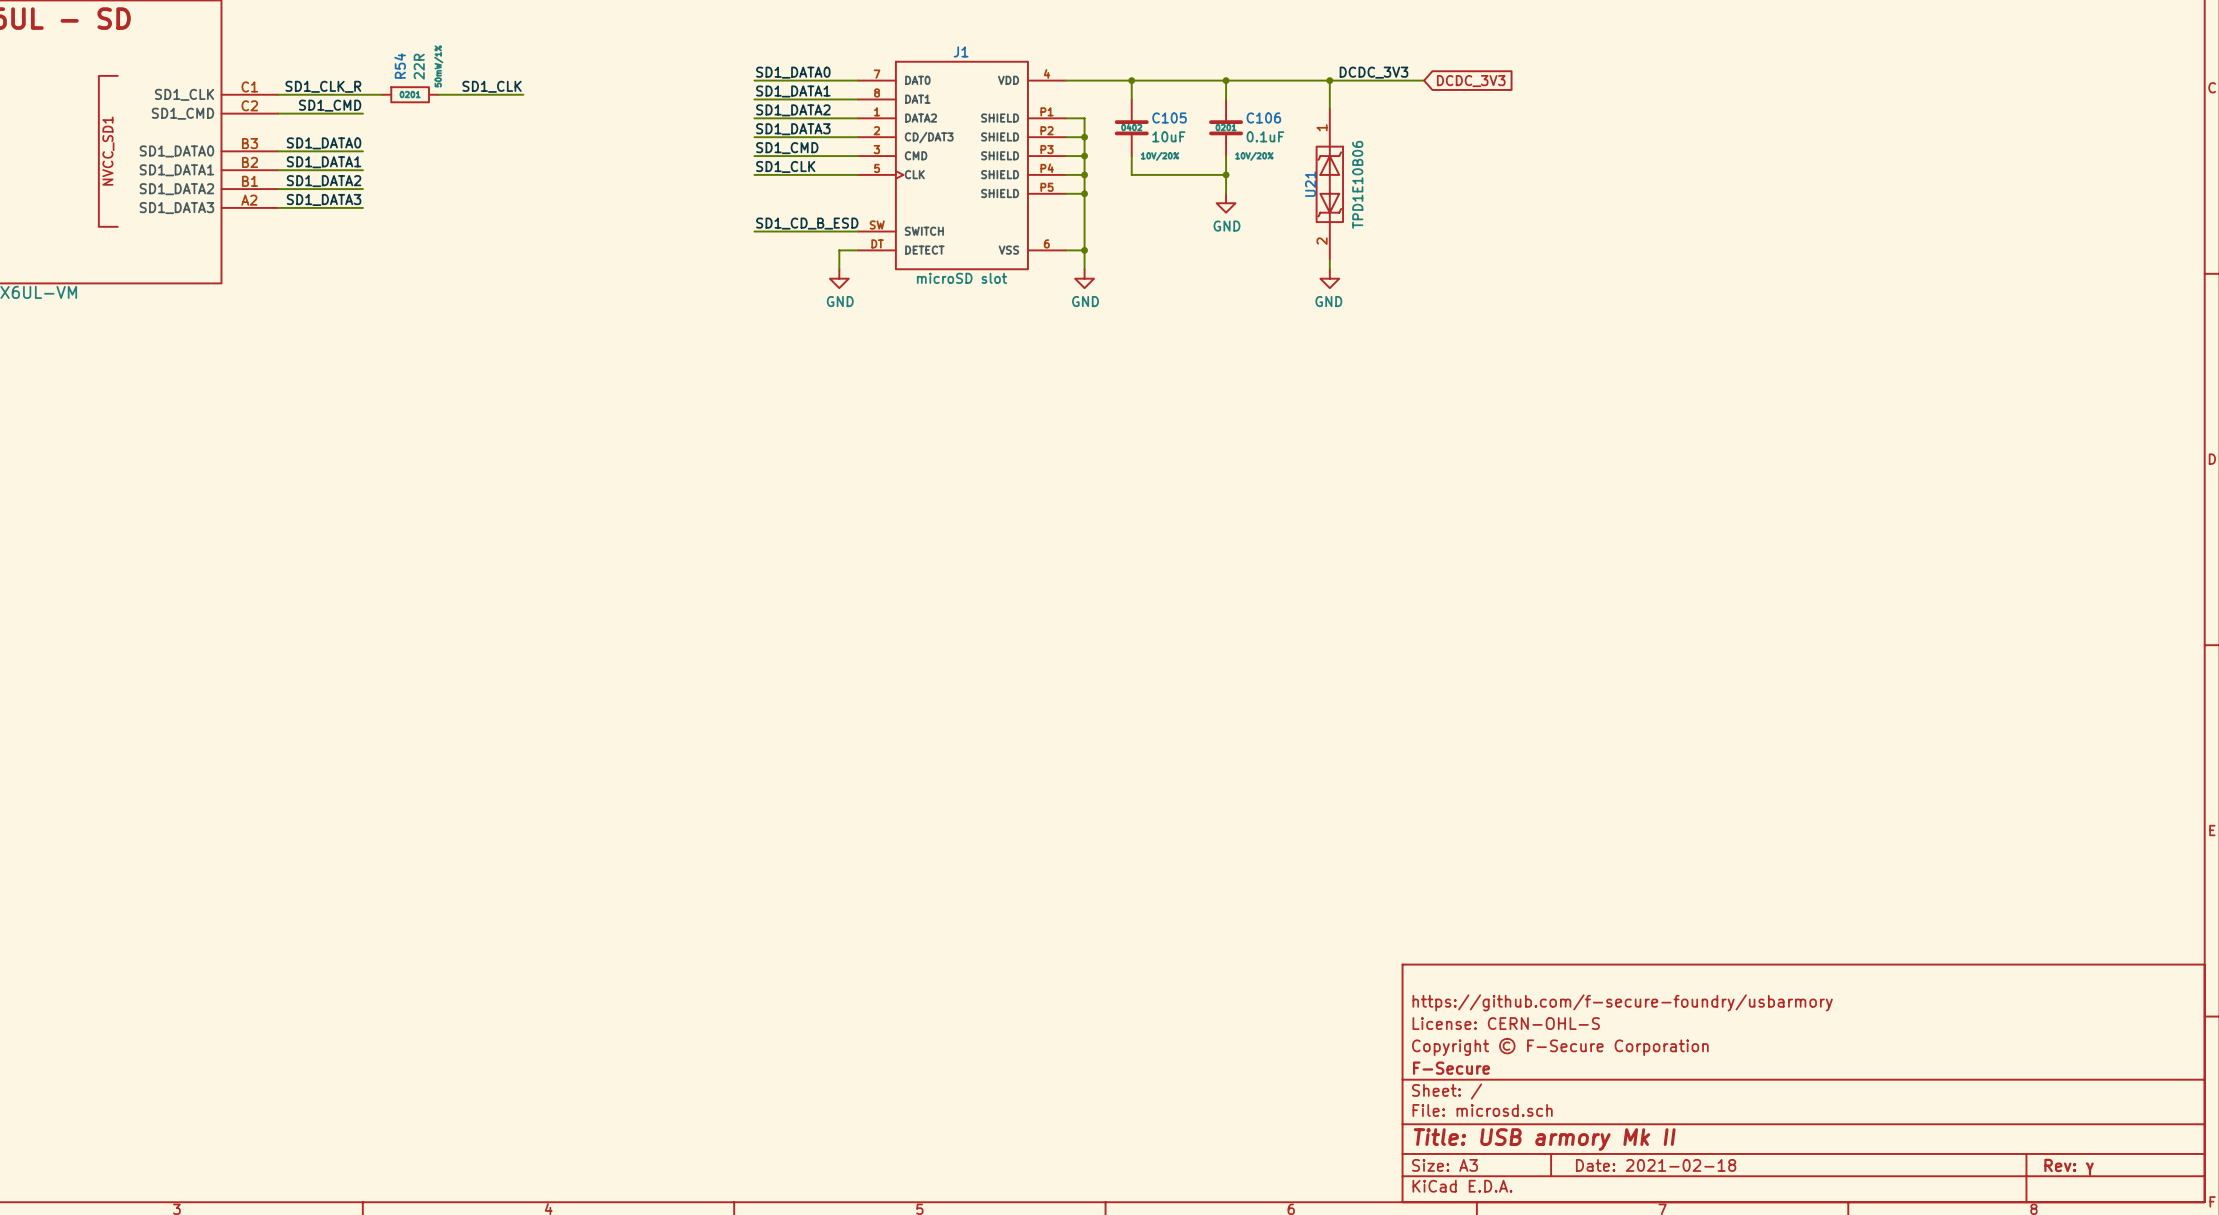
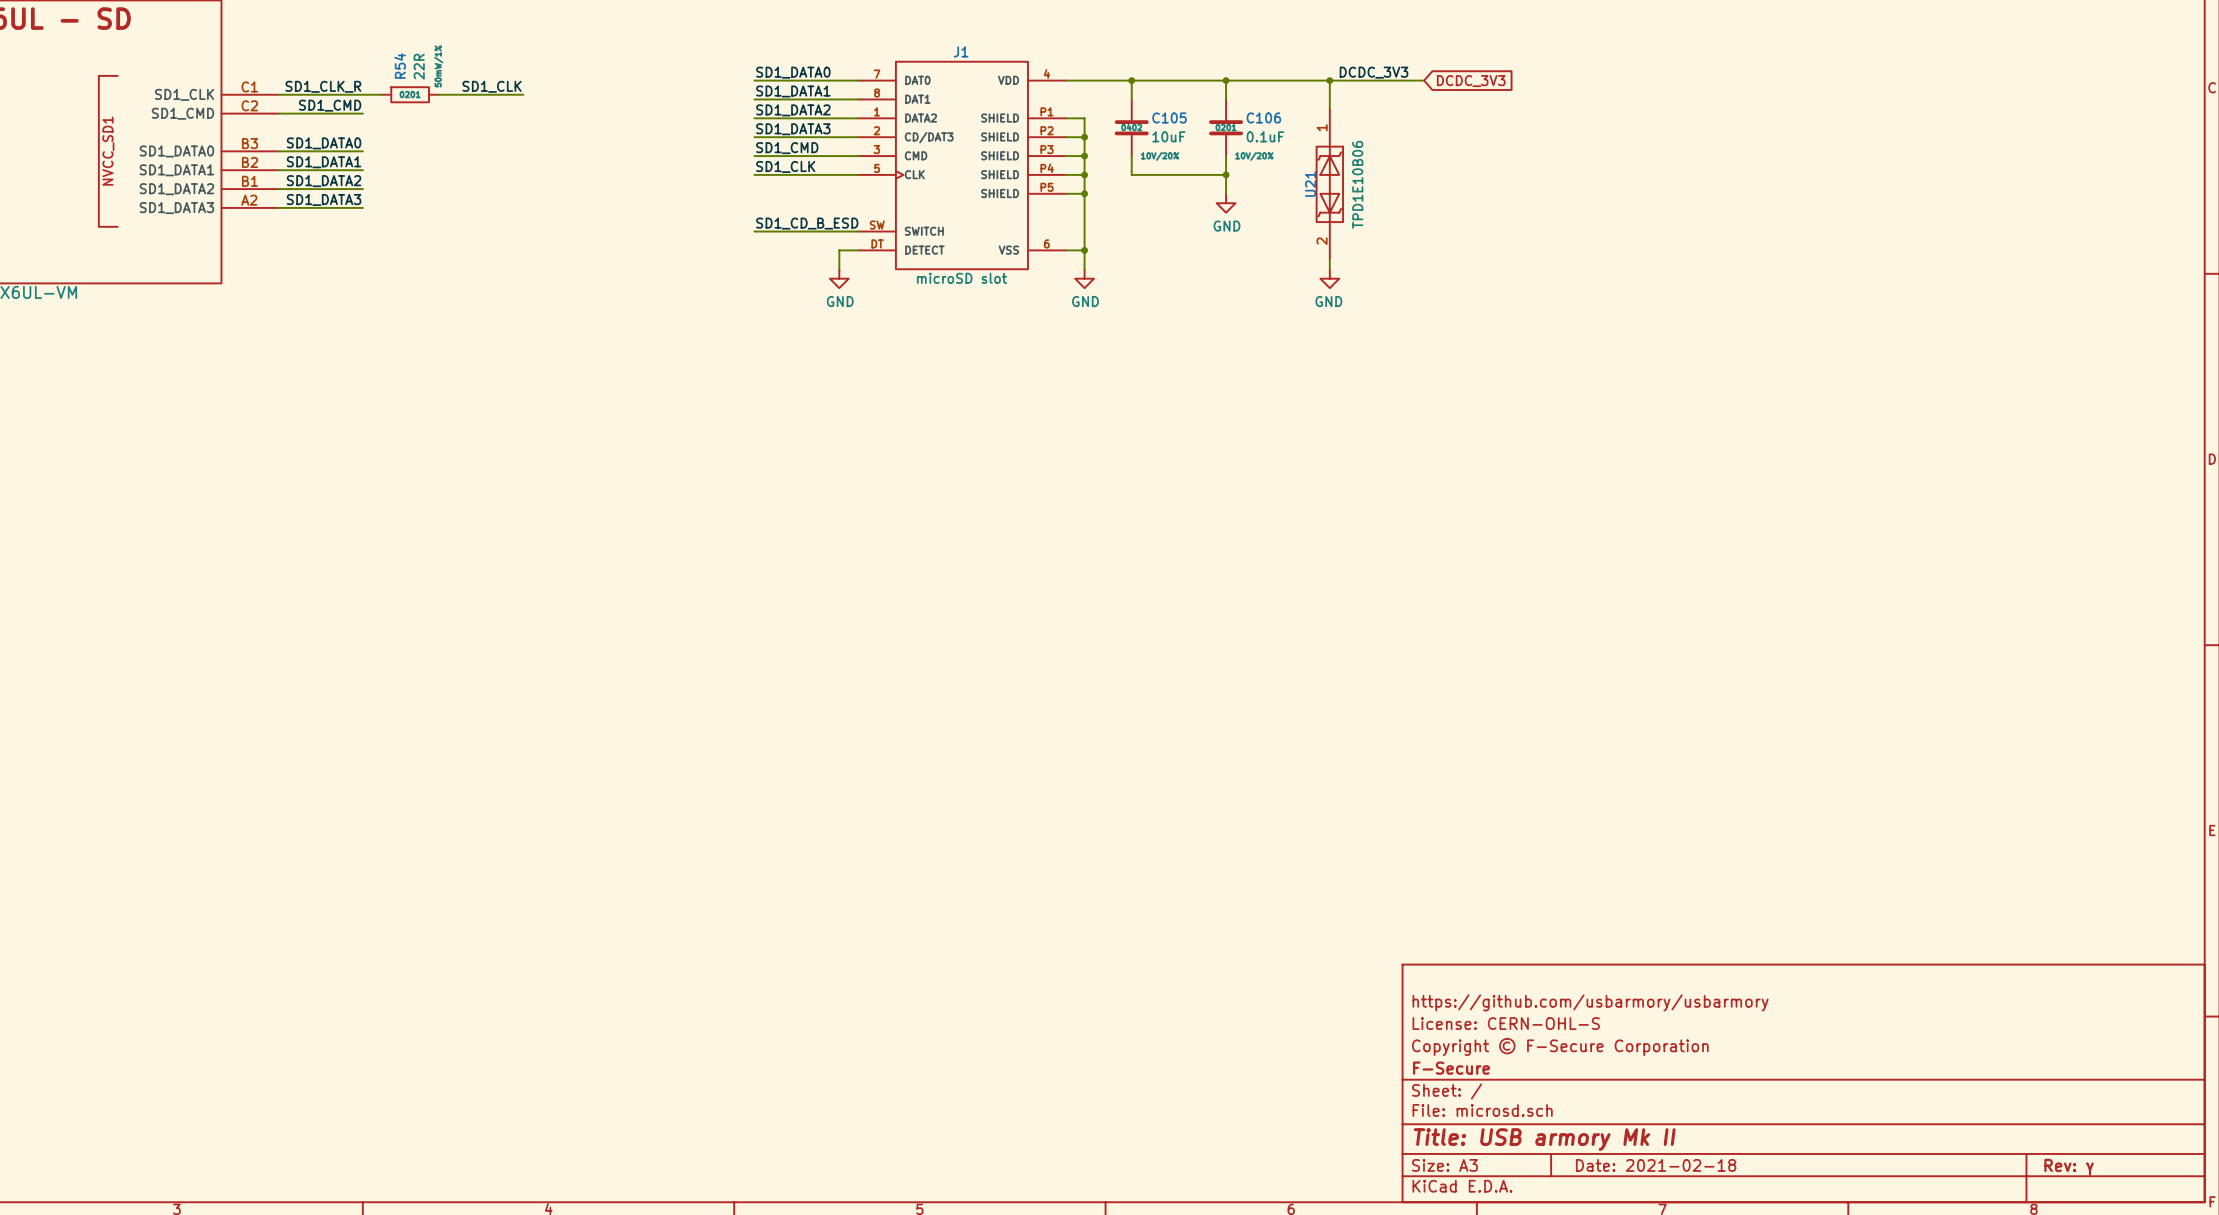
title block: https://github.com/f-secure-foundry/usbarmory (1622, 1002) -> https://github.com/usbarmory/usbarmory (1590, 1002)

